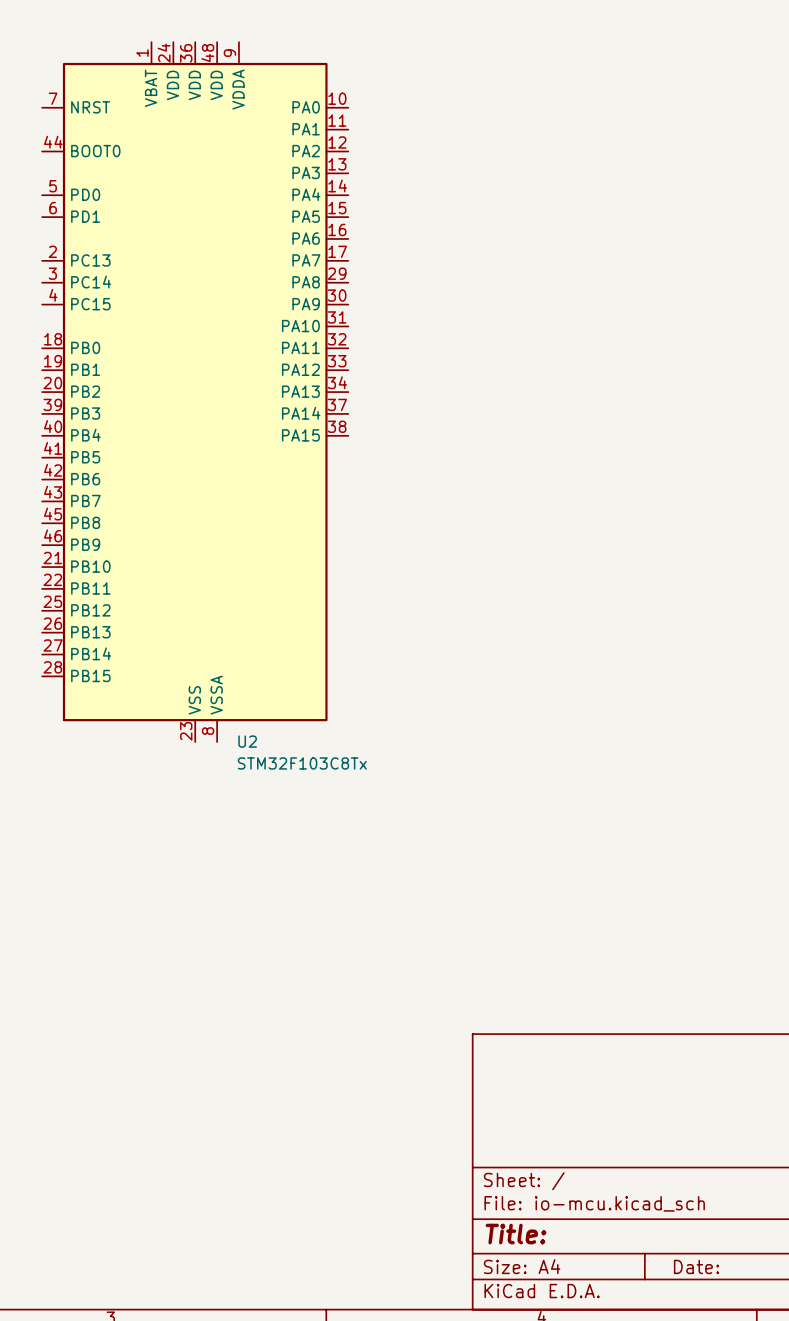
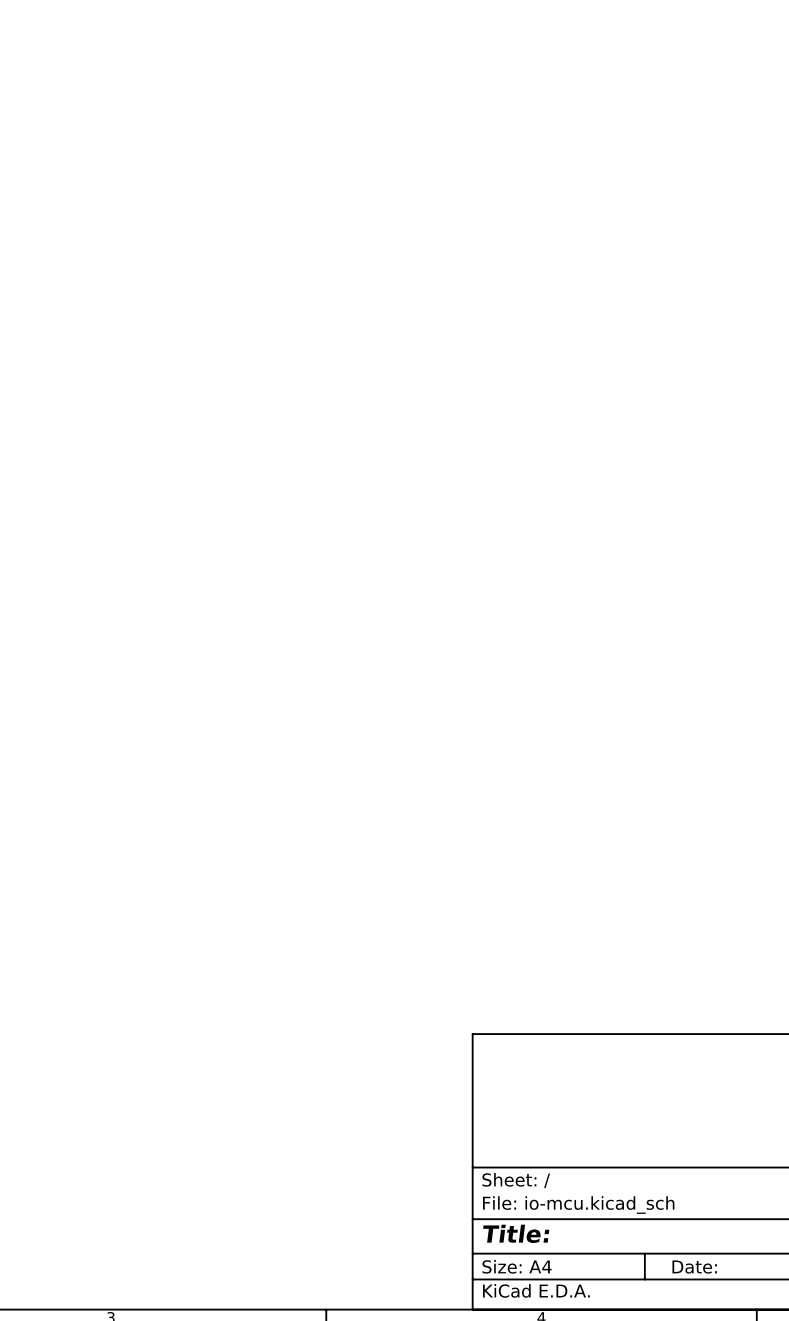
U2: STM32F103C8Tx (195, 392) -> none

